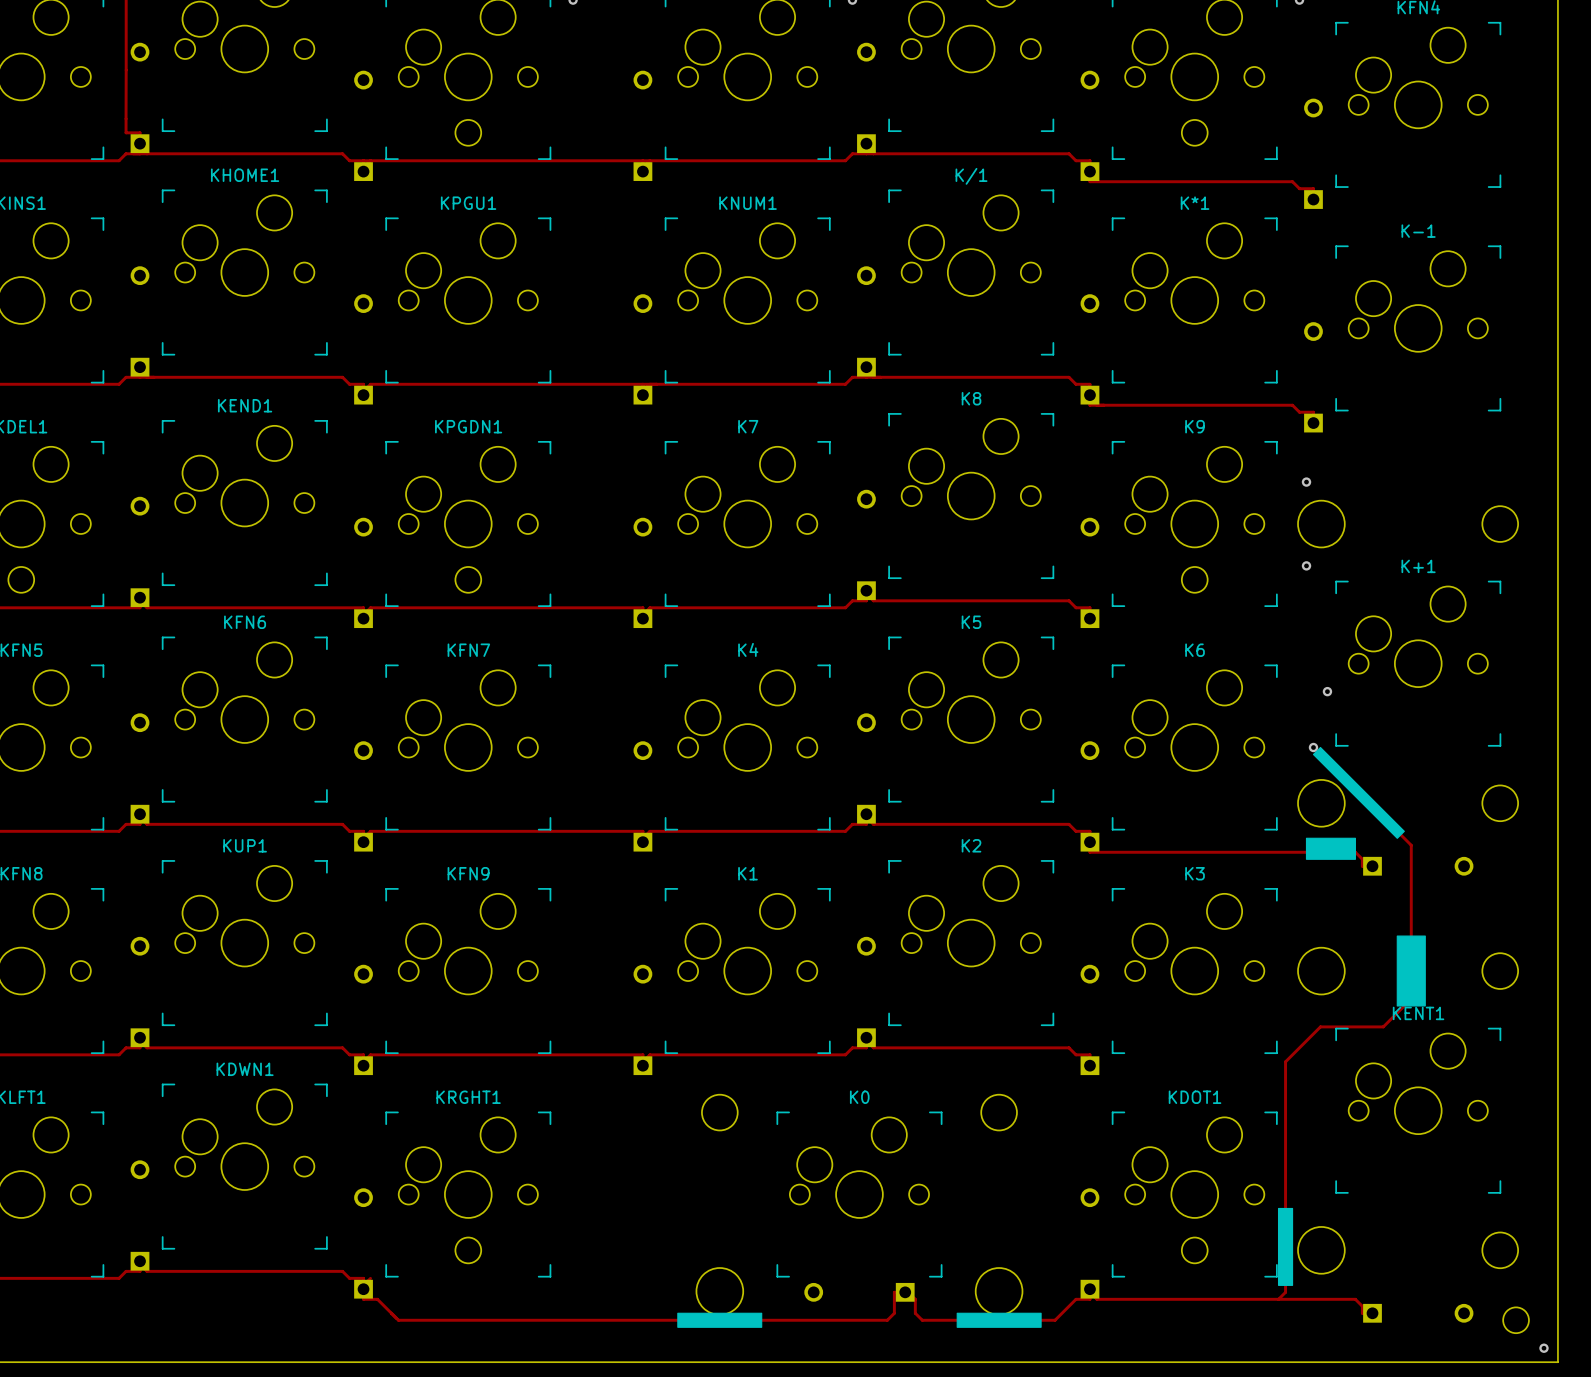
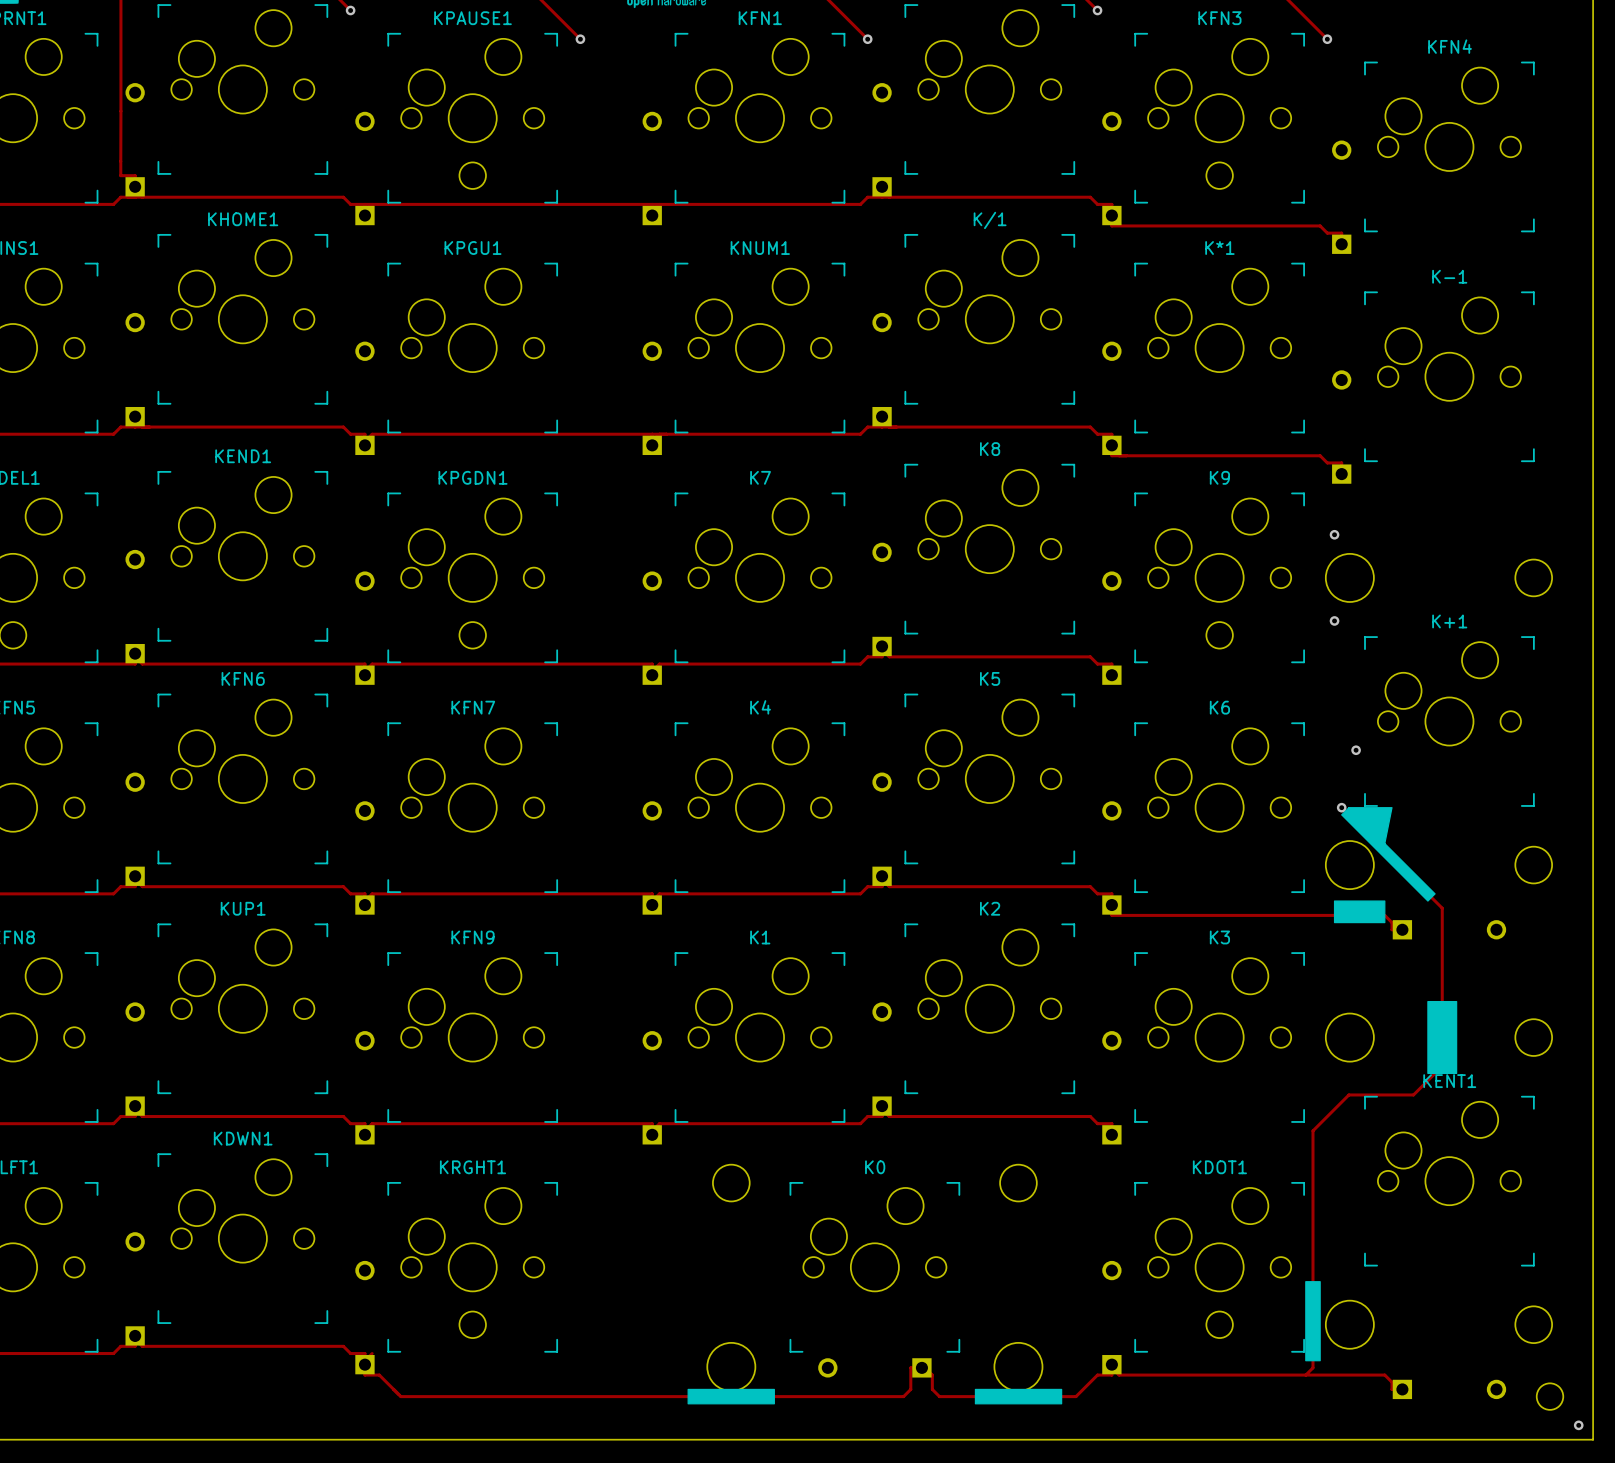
drawing: none -> [1348, 807, 1393, 845]

